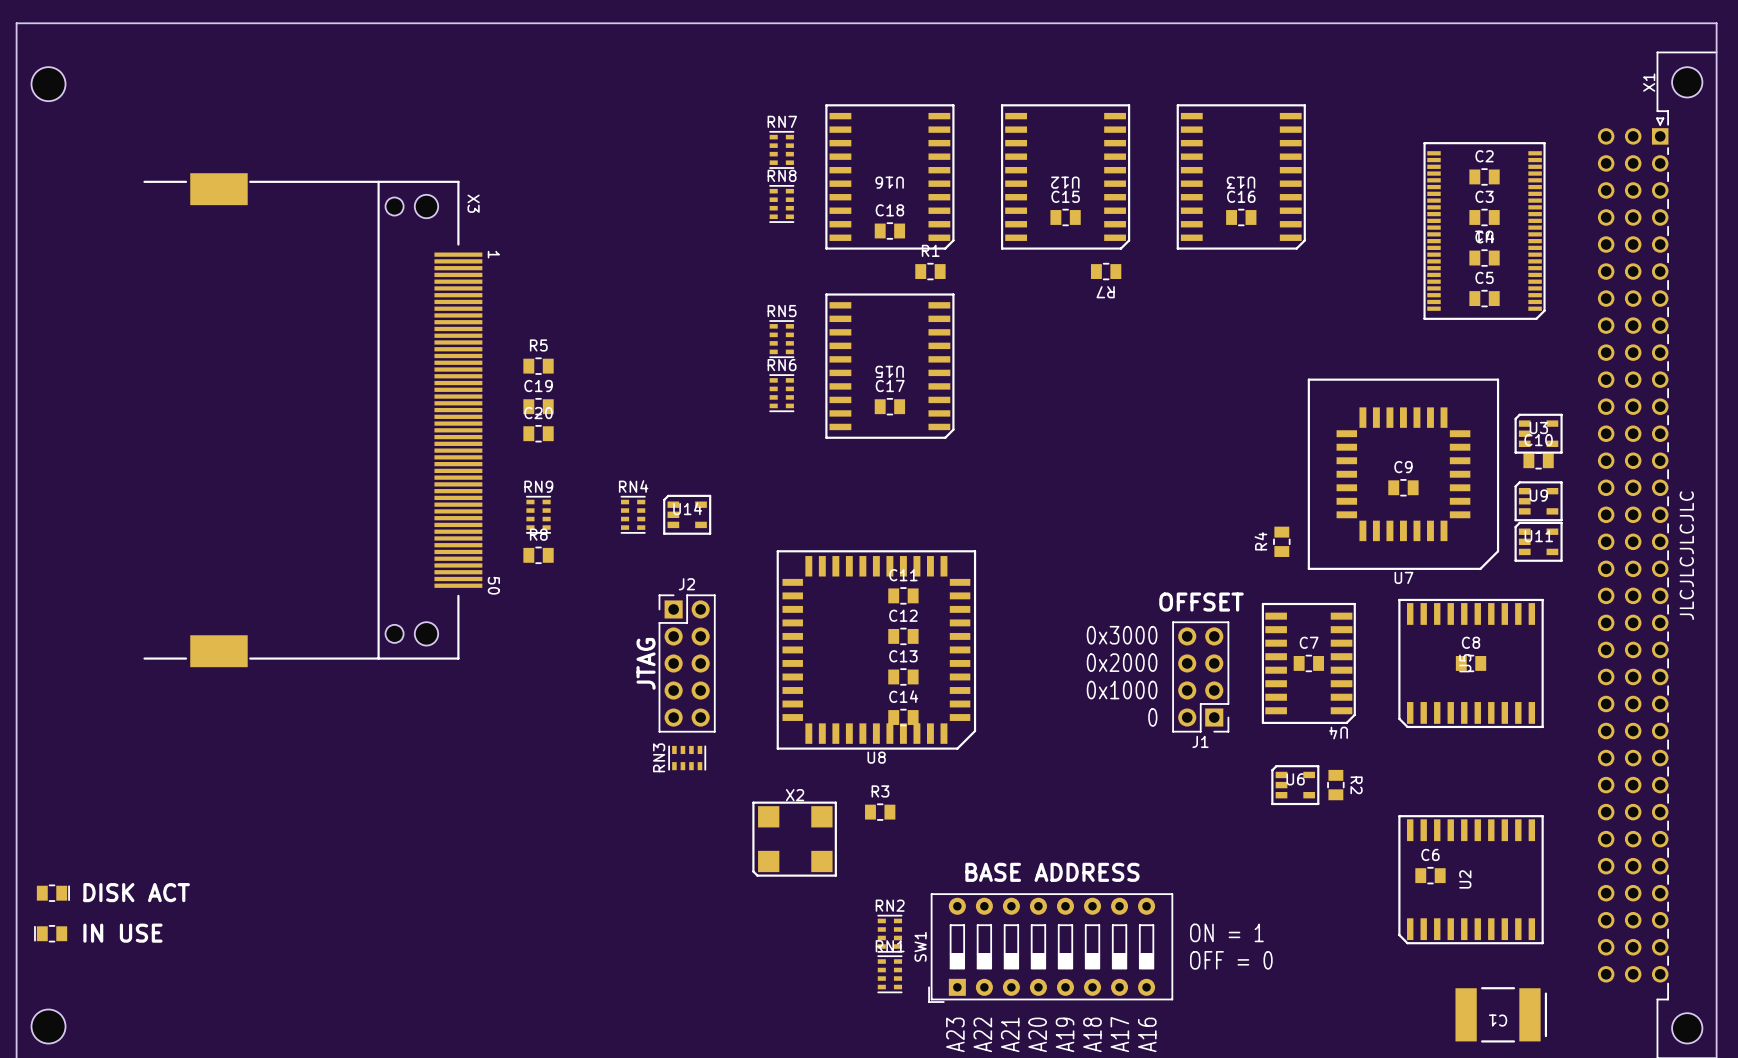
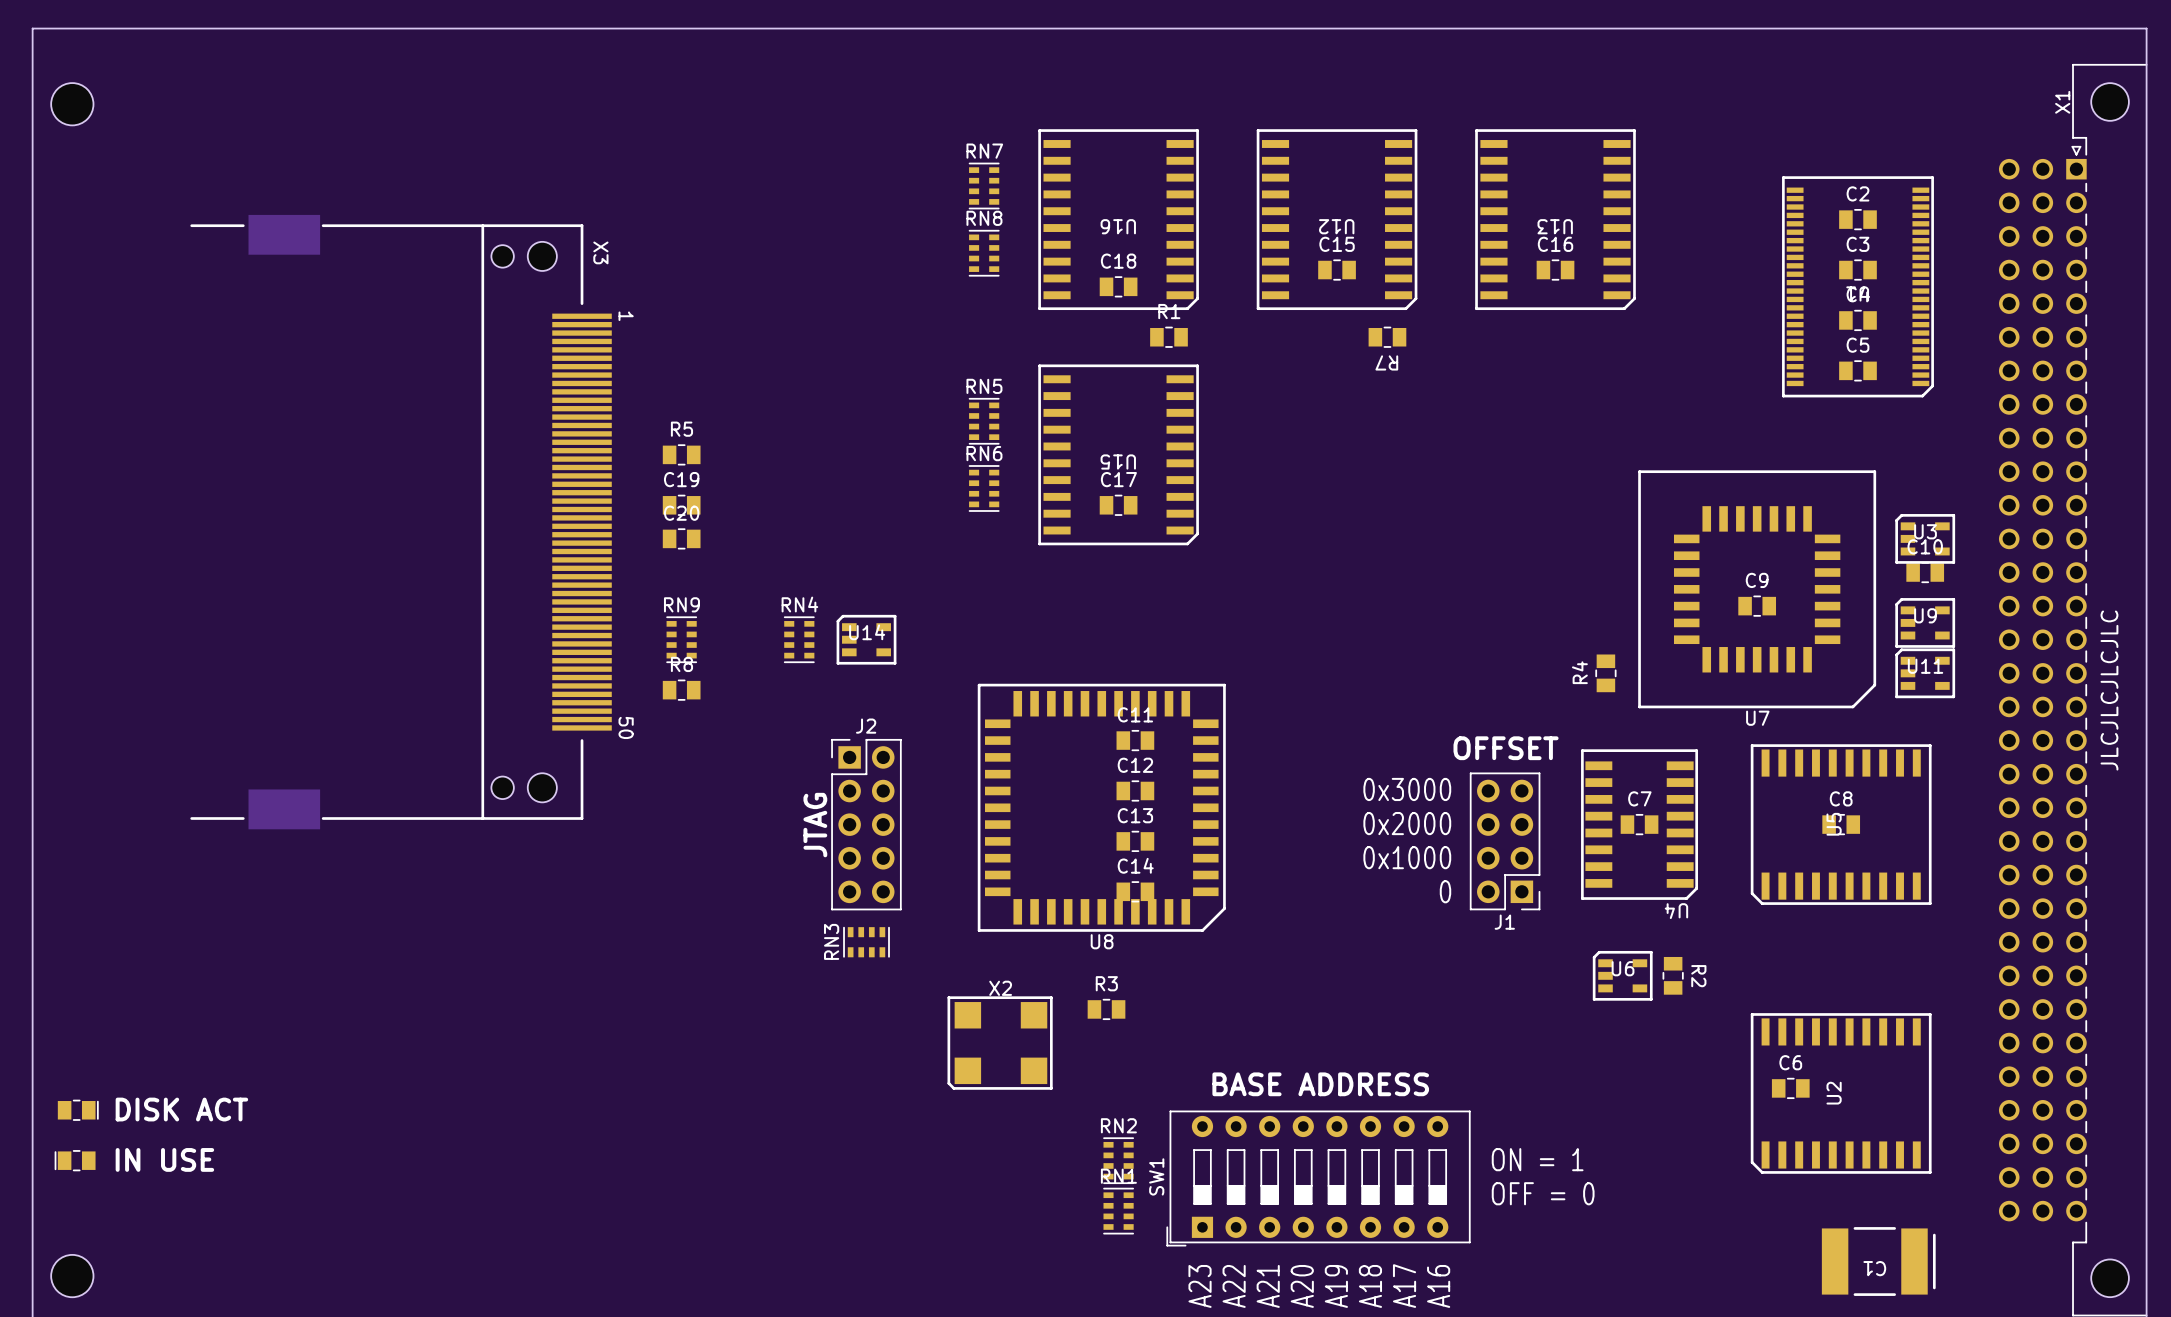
X3 footprint: [143, 173, 483, 668] -> [190, 214, 612, 830]

